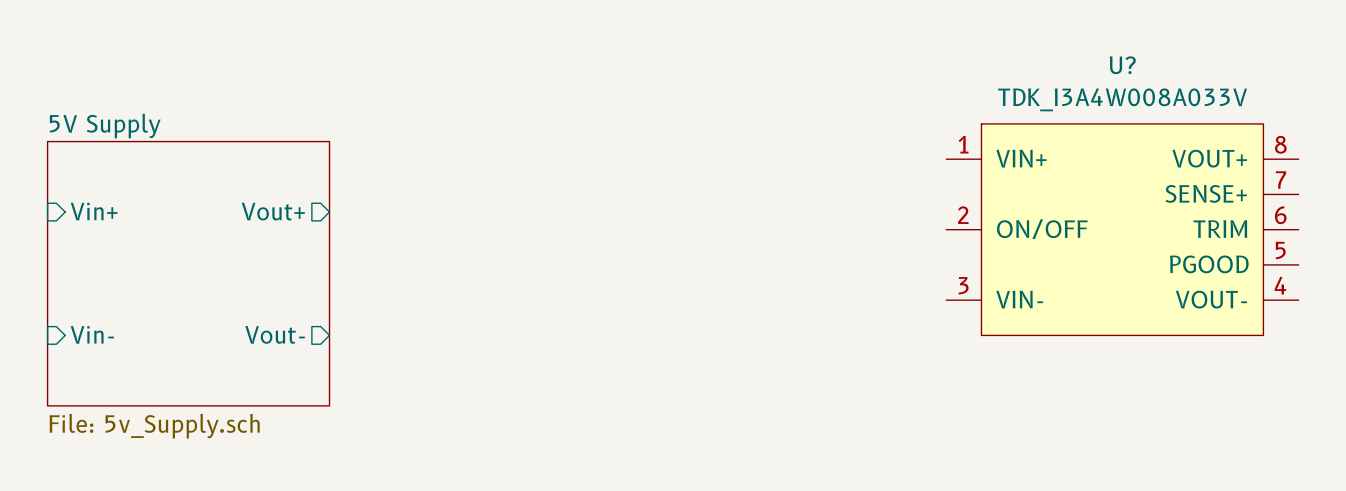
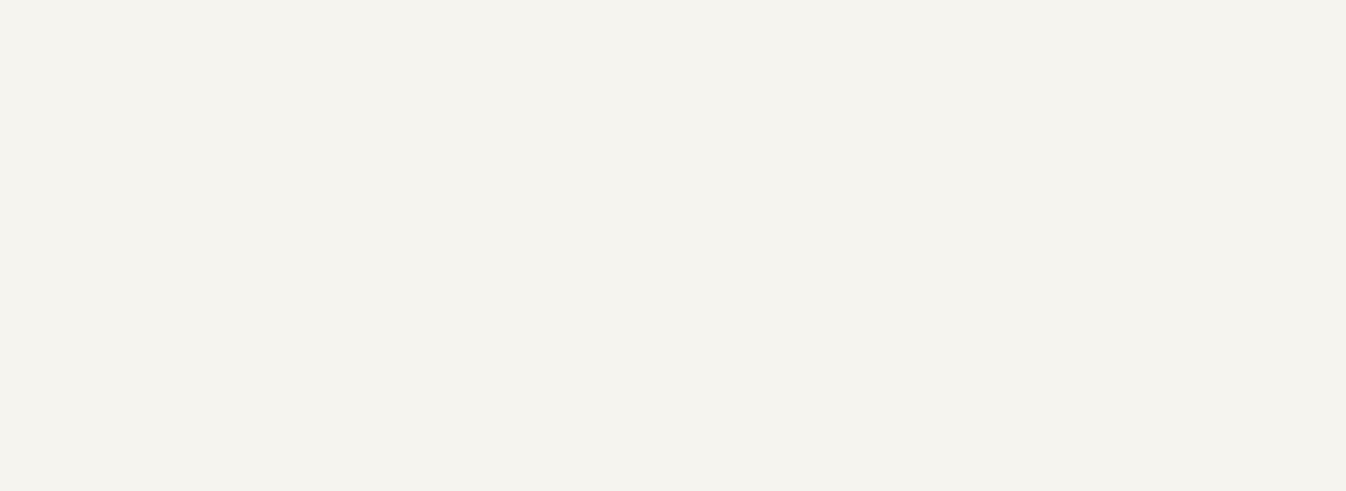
sheet pin: Vin+ (94, 211) -> none
sheet pin: Vout+ (273, 211) -> none
U?: TDK_I3A4W008A033V (1122, 229) -> none
sheet 5V Supply: File: 5v_Supply.sch (188, 273) -> none
sheet pin: Vin- (92, 334) -> none
sheet pin: Vout- (275, 334) -> none

